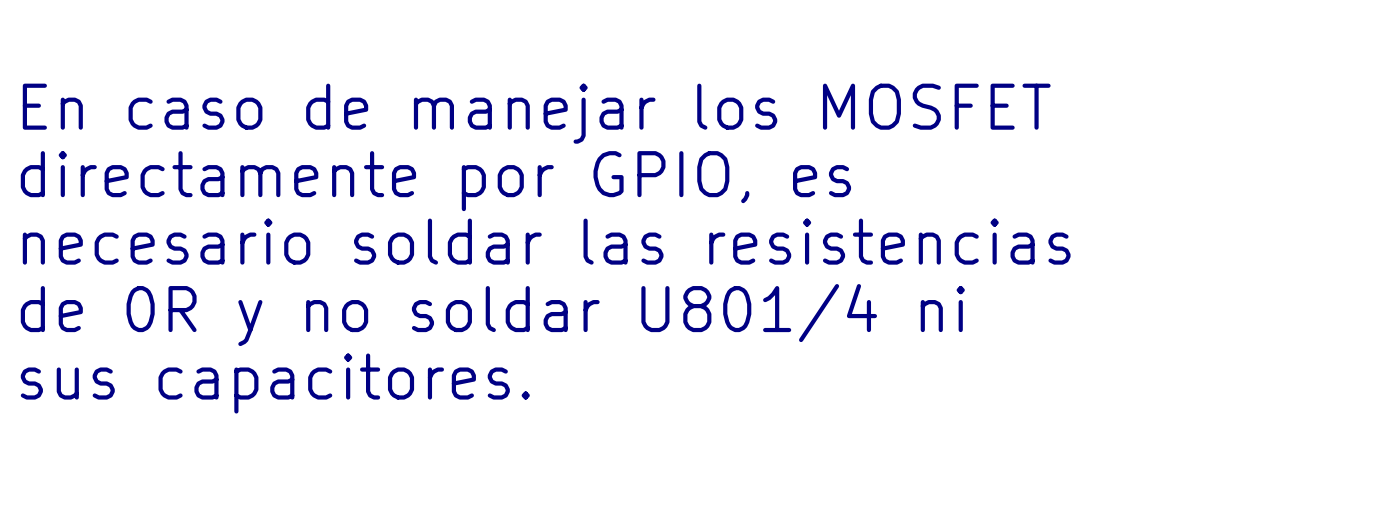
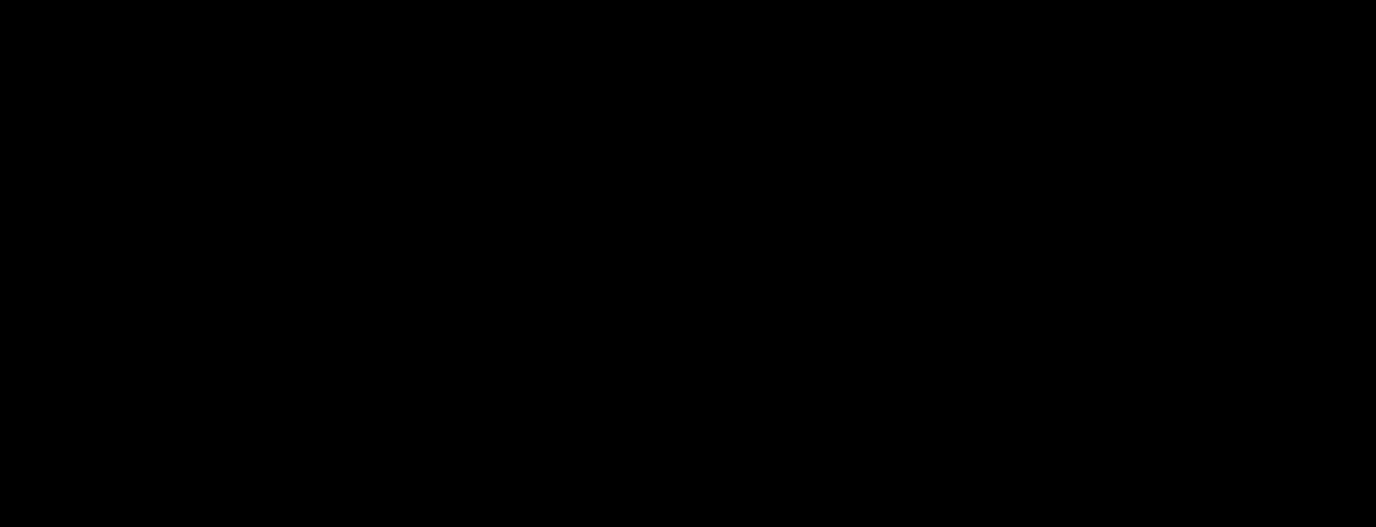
text: En caso de manejar los MOSFET (536, 113) -> none
text: directamente por GPIO, es (435, 181) -> none
text: necesario soldar las resistencias (546, 241) -> none
text: de 0R y no soldar U801/4 ni (492, 315) -> none
text: sus capacitores. (275, 383) -> none

